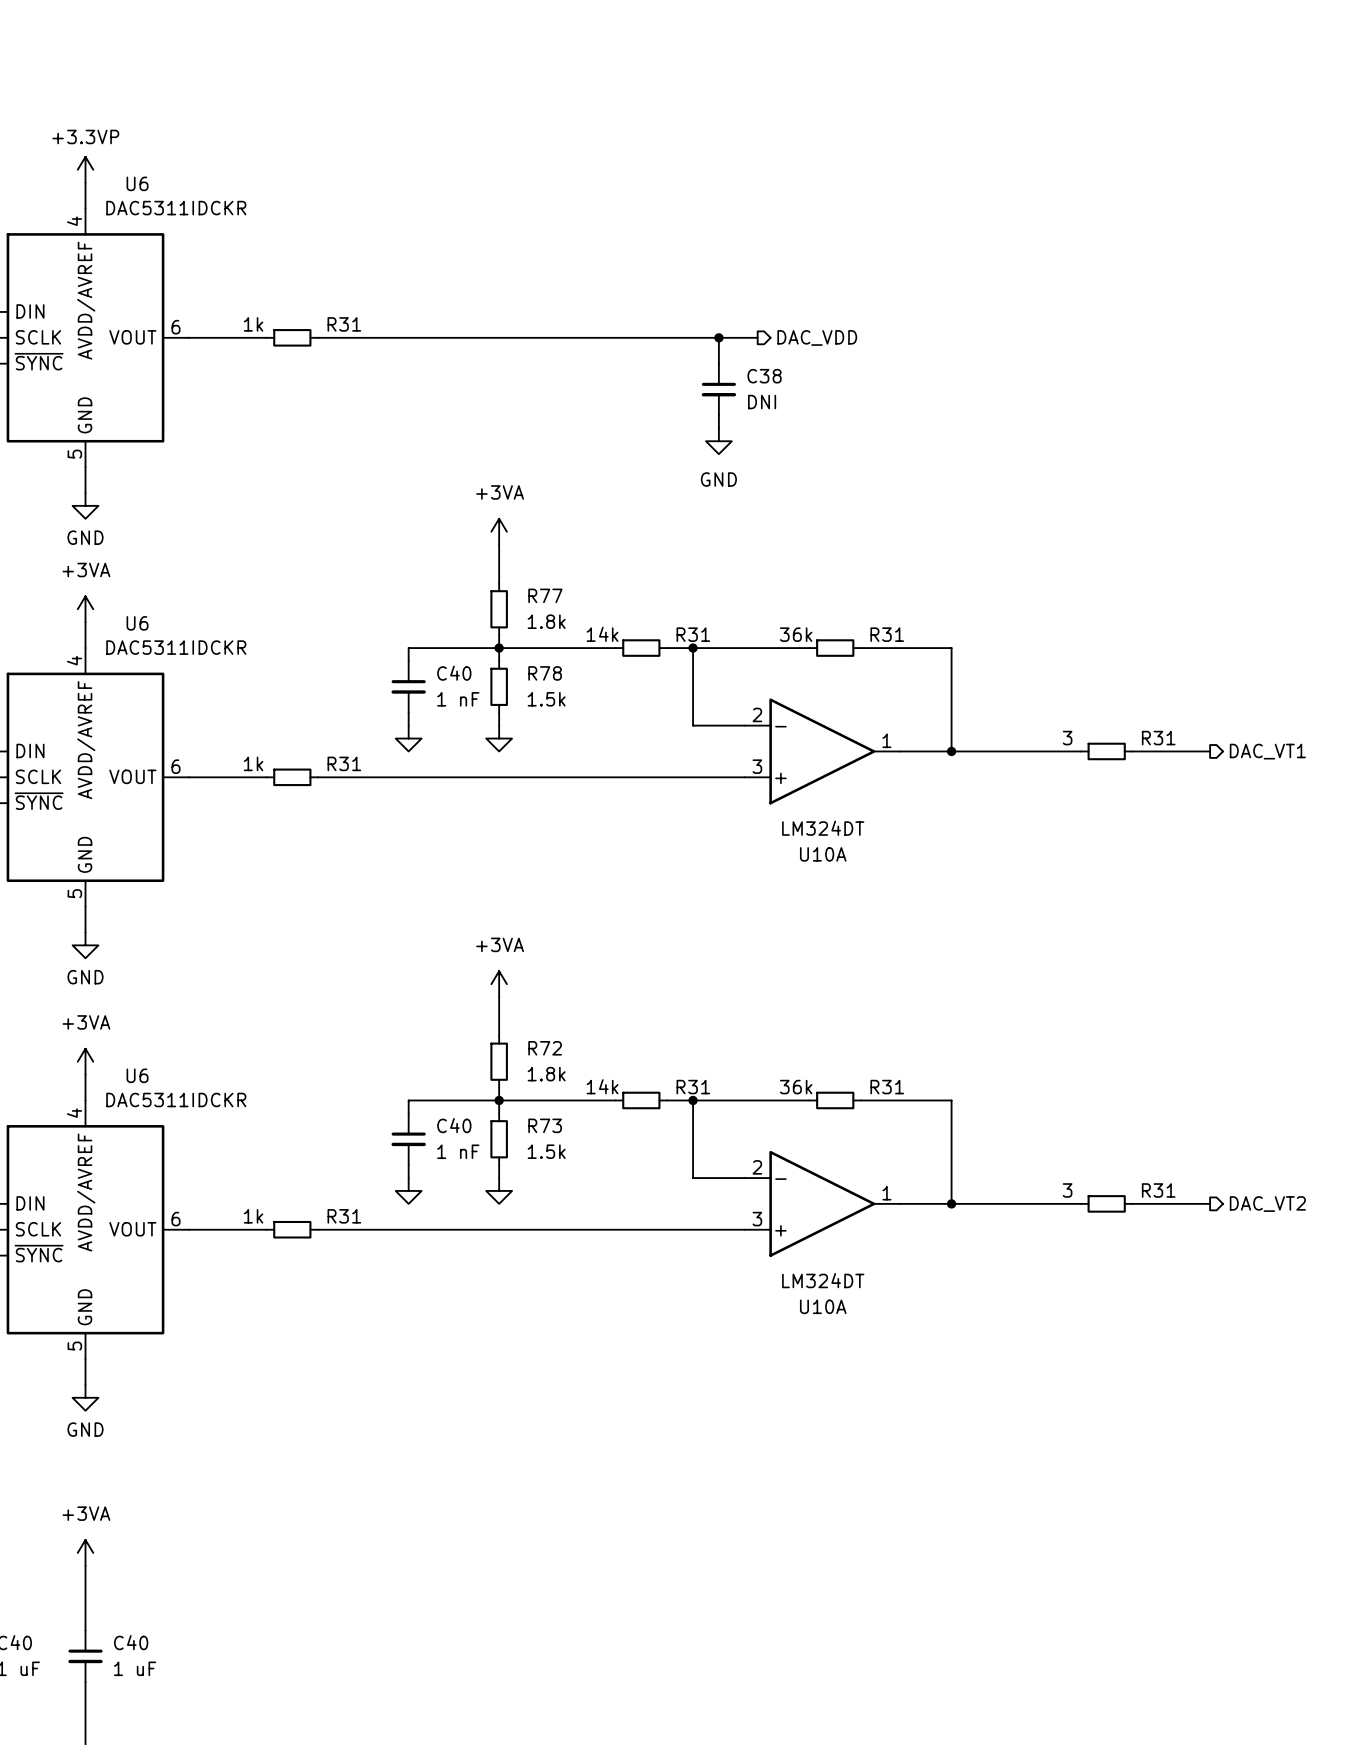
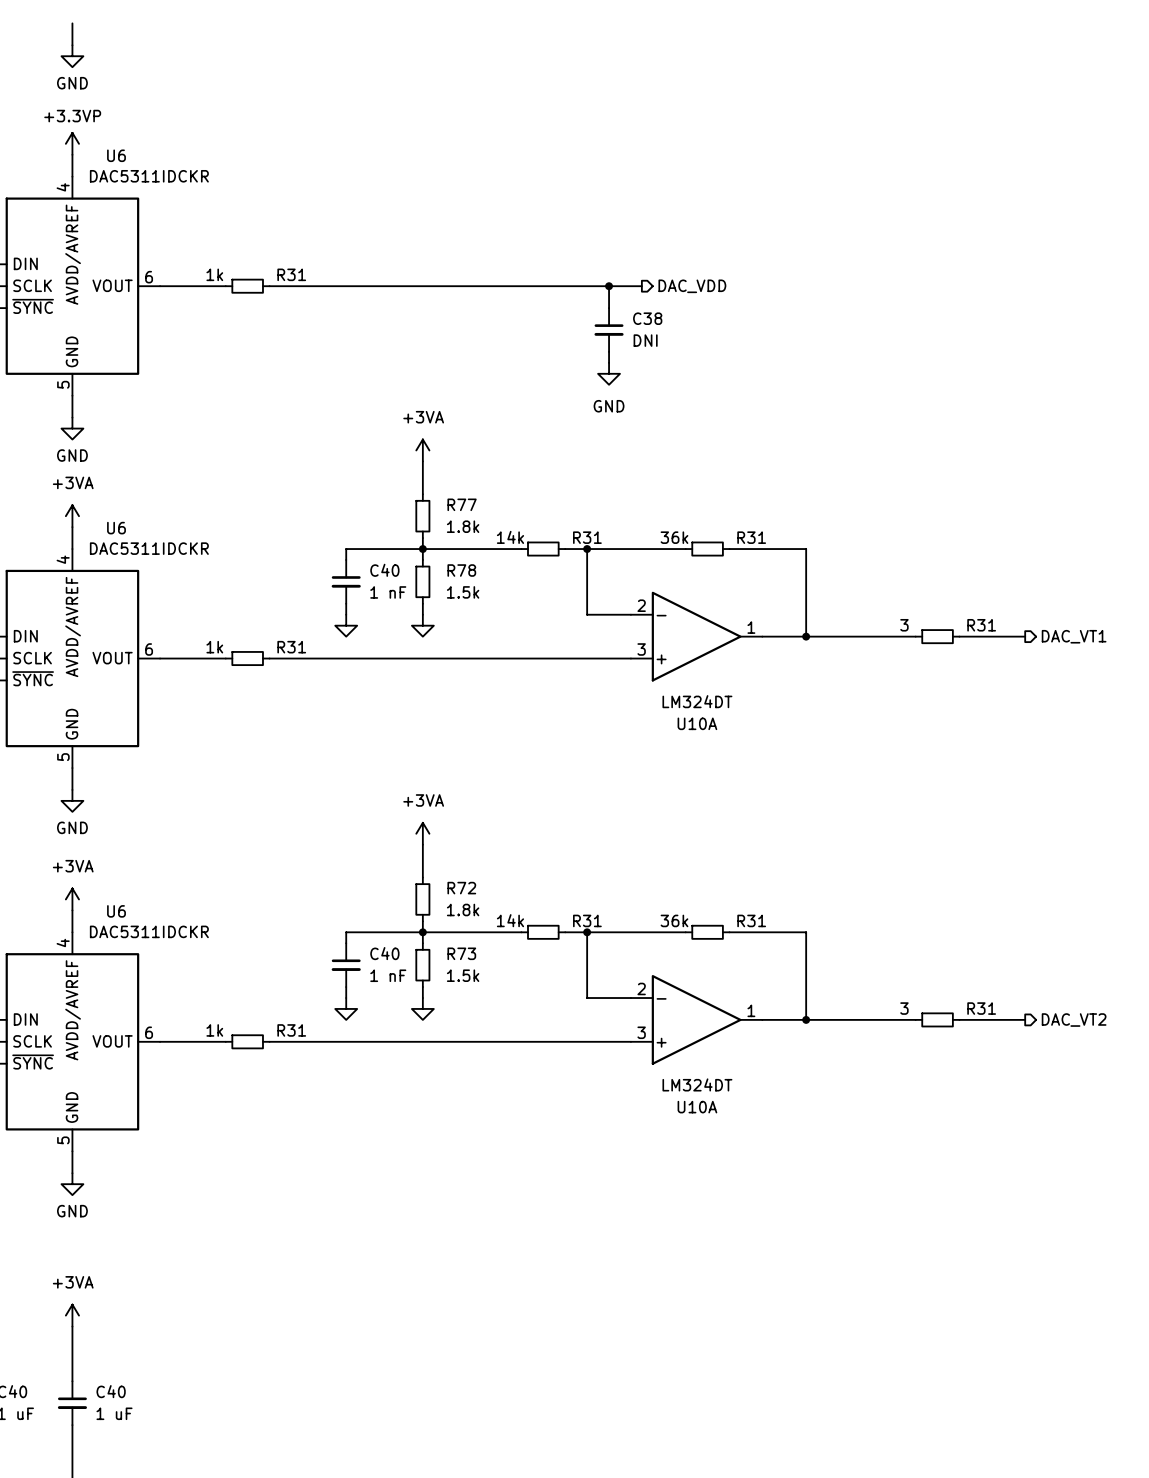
wire: none -> (72, 23) (72, 45)
power symbol: none -> GND (72, 56)

